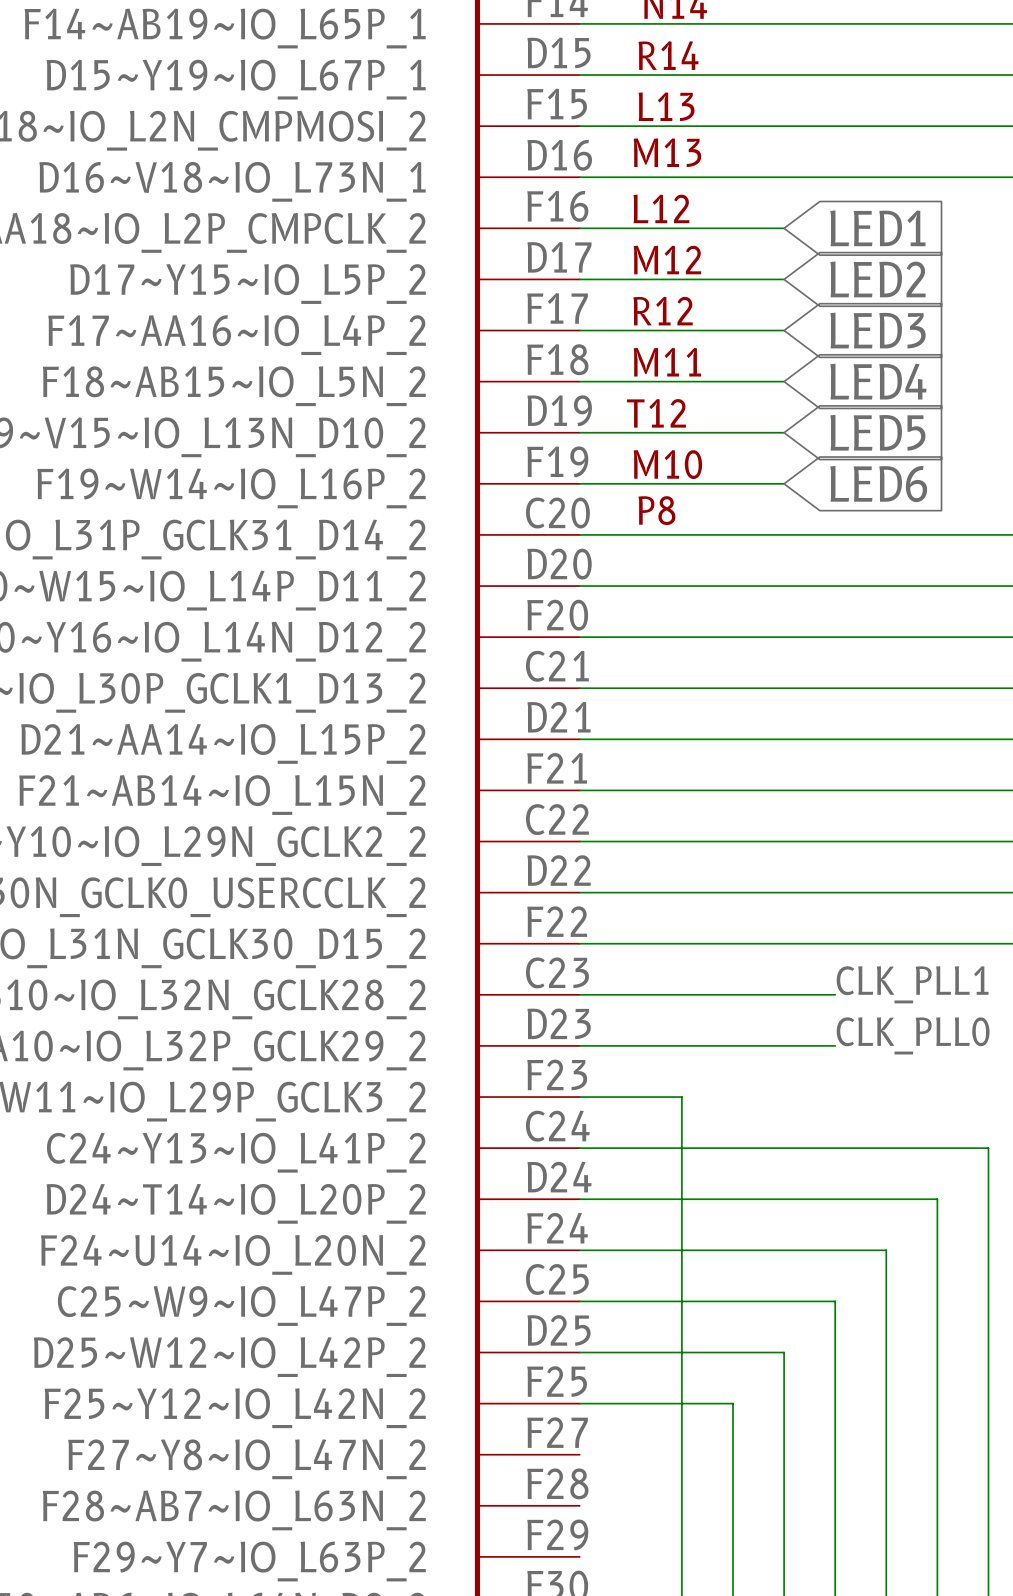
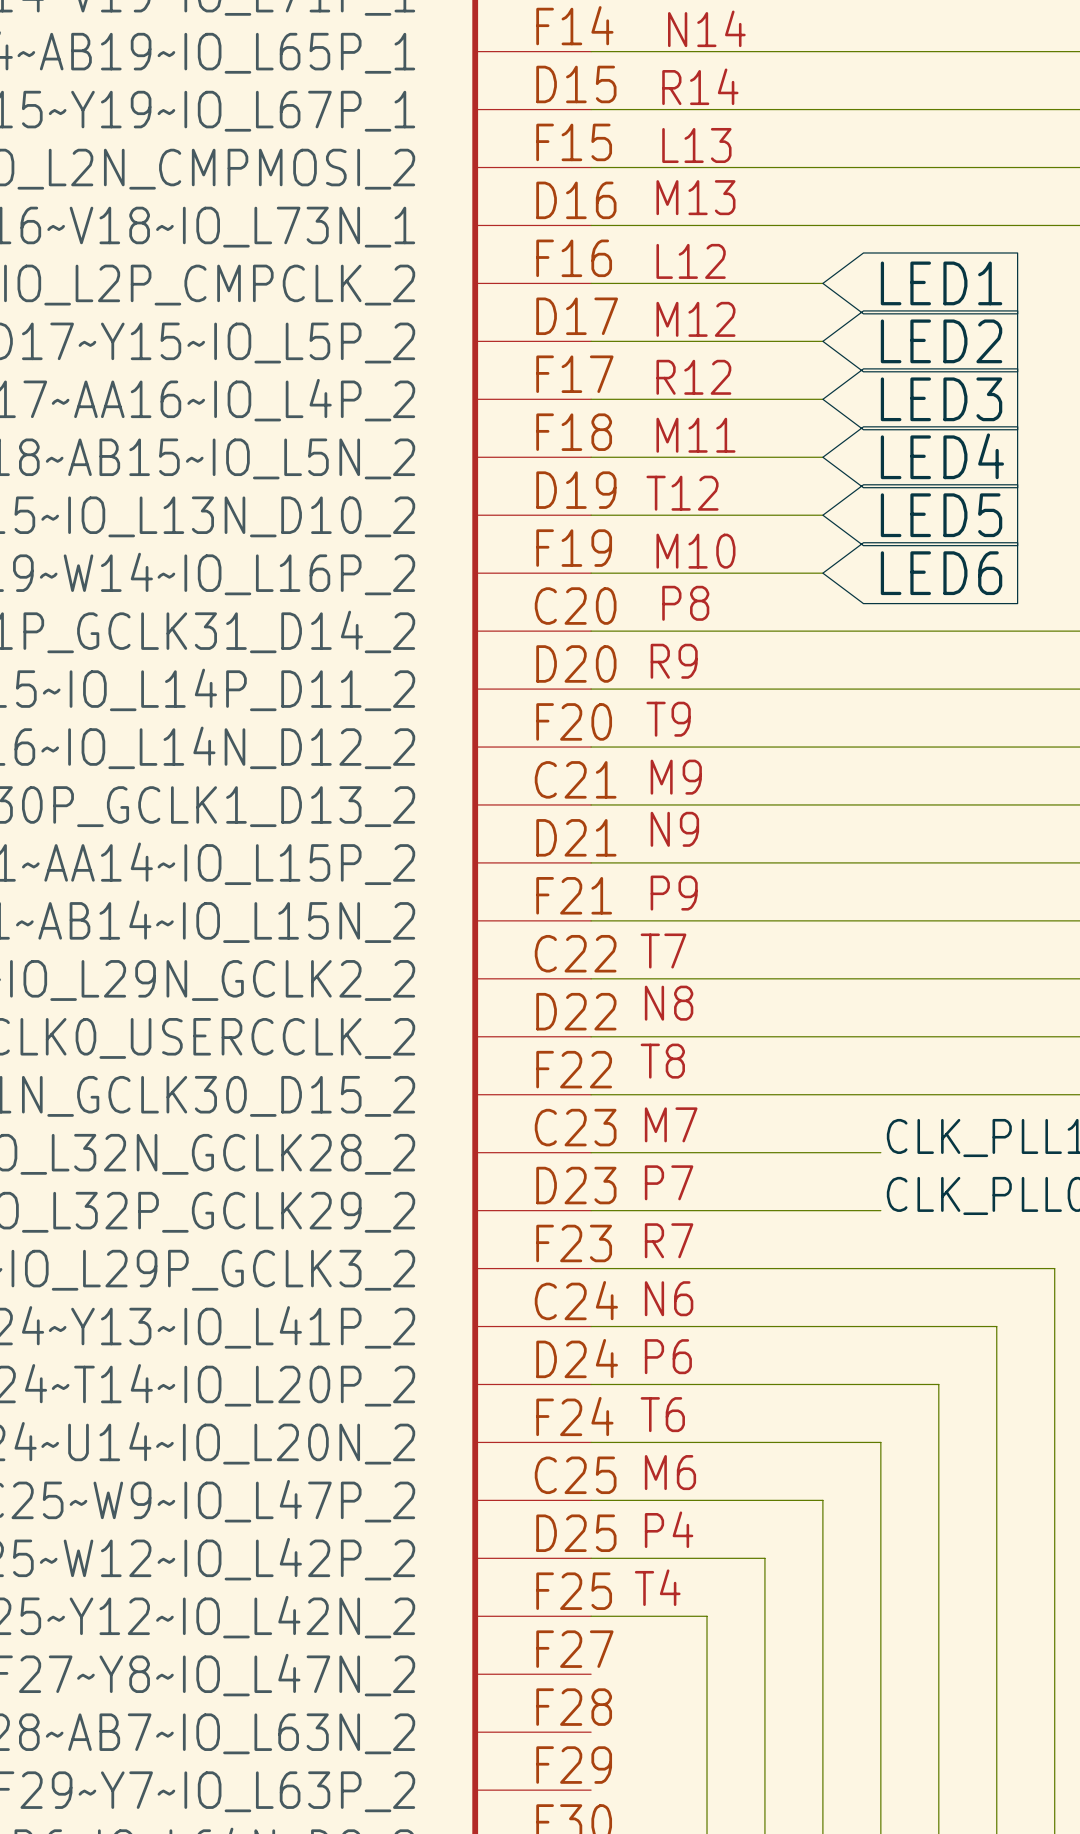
text: none -> R9 (674, 661)
text: none -> T9 (668, 719)
text: none -> M9 (676, 777)
text: none -> N9 (674, 829)
text: none -> P9 (674, 893)
text: none -> T7 (663, 951)
text: none -> N8 (669, 1003)
text: none -> T8 (662, 1061)
text: none -> M7 (671, 1124)
text: none -> P7 (669, 1182)
text: none -> R7 (669, 1240)
wire: (681, 1097) (681, 1403) (732, 1403) -> none
text: none -> N6 (669, 1298)
wire: (937, 1148) (988, 1148) -> (707, 1268) (1054, 1268) (1054, 1326)
text: none -> P6 (668, 1356)
wire: (886, 1199) (937, 1199) -> (996, 1326) (996, 1384)
text: none -> T6 (662, 1414)
wire: (835, 1250) (886, 1250) -> (938, 1384) (938, 1442)
text: none -> M6 (670, 1472)
wire: (784, 1301) (835, 1301) -> (880, 1442) (880, 1500)
wire: none -> (822, 1500) (822, 1558)
text: none -> P4 (669, 1529)
wire: (732, 1352) (784, 1352) -> (764, 1558) (764, 1616)
text: none -> T4 (657, 1587)

